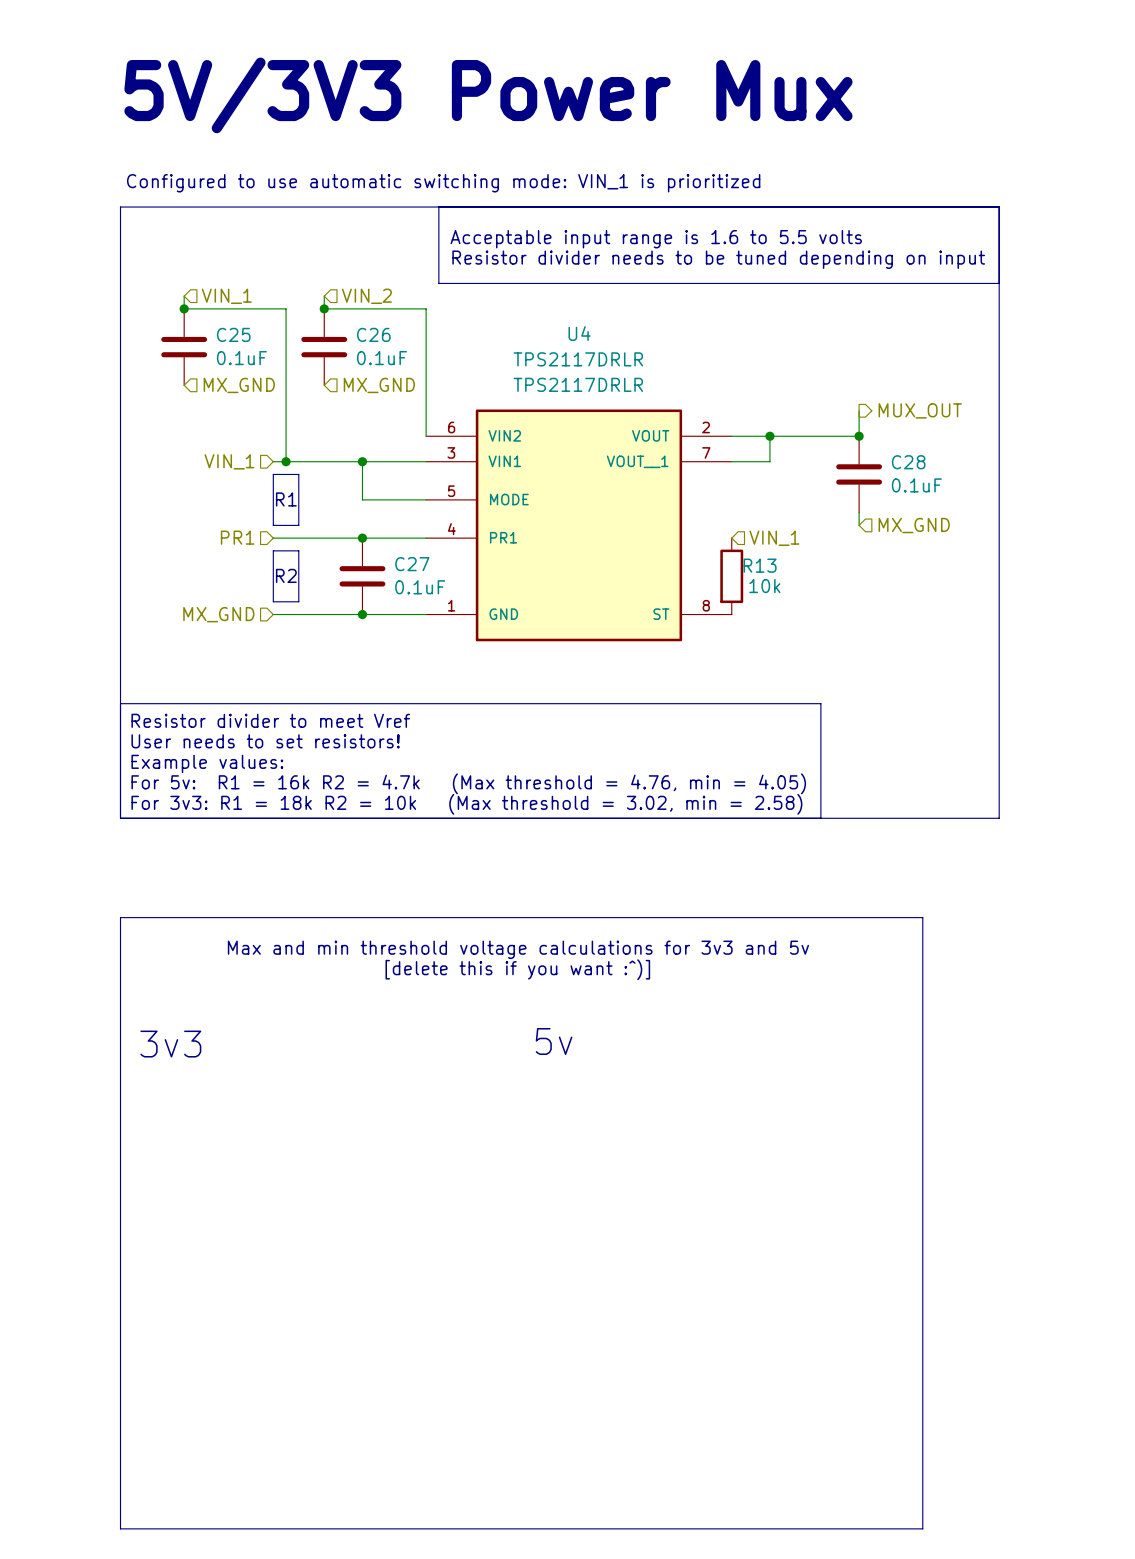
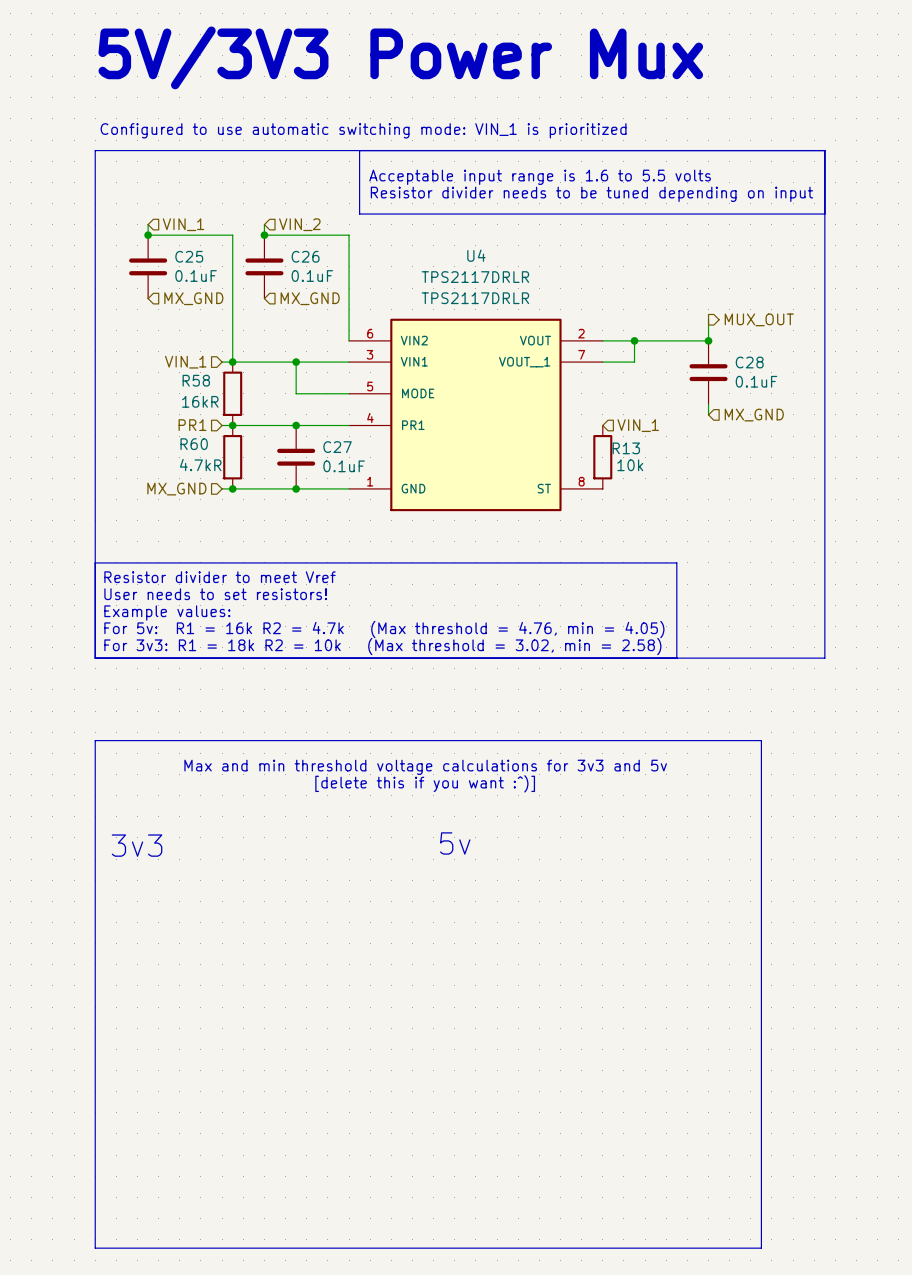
line: (273, 474) (298, 474) (298, 525) (273, 525) (273, 474) -> none
text: R1 (286, 499) -> none
R58: none -> 16kR (232, 393)
junction: none -> (232, 425)
line: (273, 550) (273, 601) (298, 601) (298, 550) (273, 550) -> none
text: R2 (286, 575) -> none
R60: none -> 4.7kR (232, 457)
junction: none -> (232, 488)

